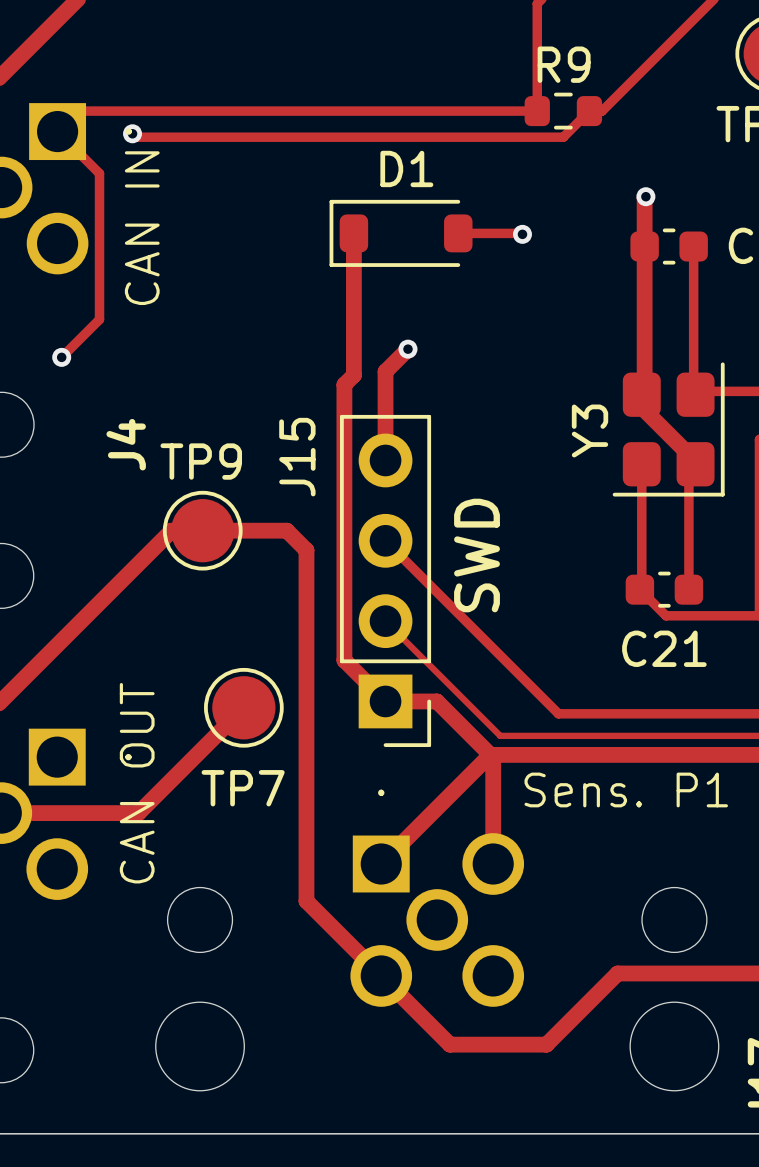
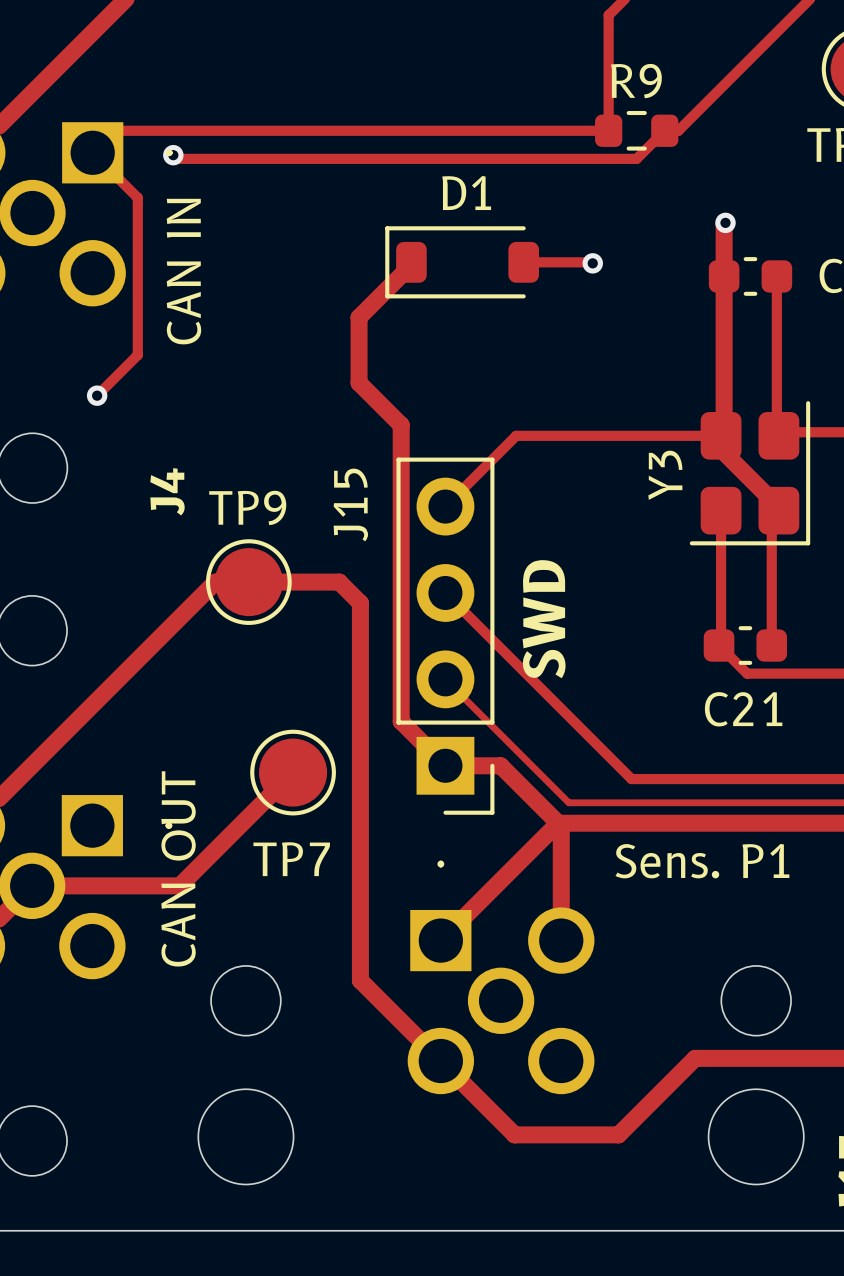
track: (353, 235) (353, 375) (344, 384) -> (411, 265) (359, 317) (359, 382) (401, 425)
track: (408, 349) (385, 371) (385, 460) (390, 460) -> none
via: (408, 349) -> none
track: none -> (721, 435) (516, 435) (445, 506)

